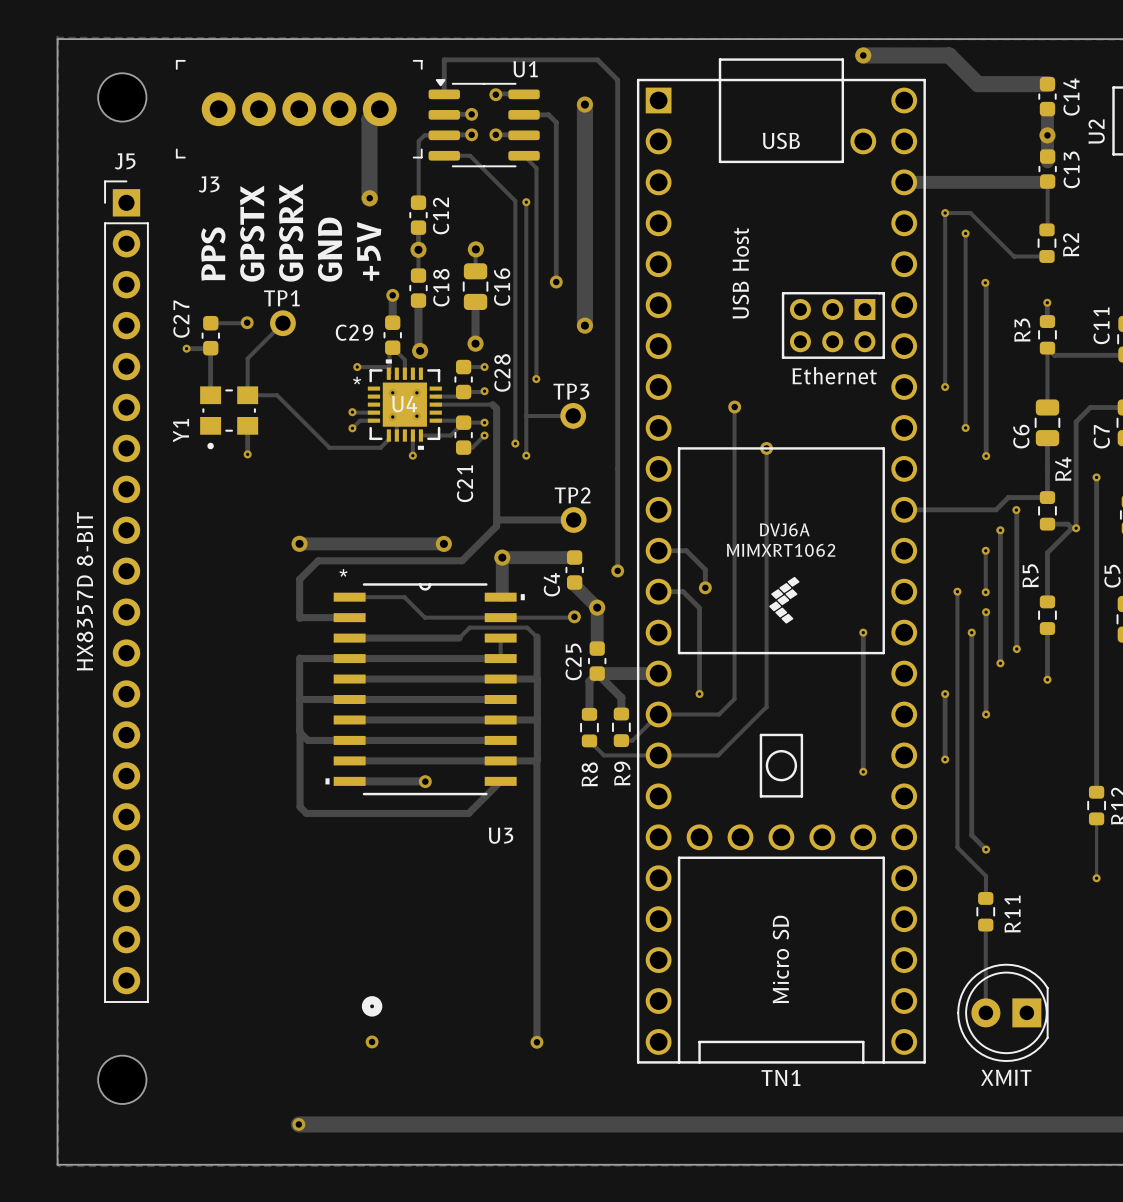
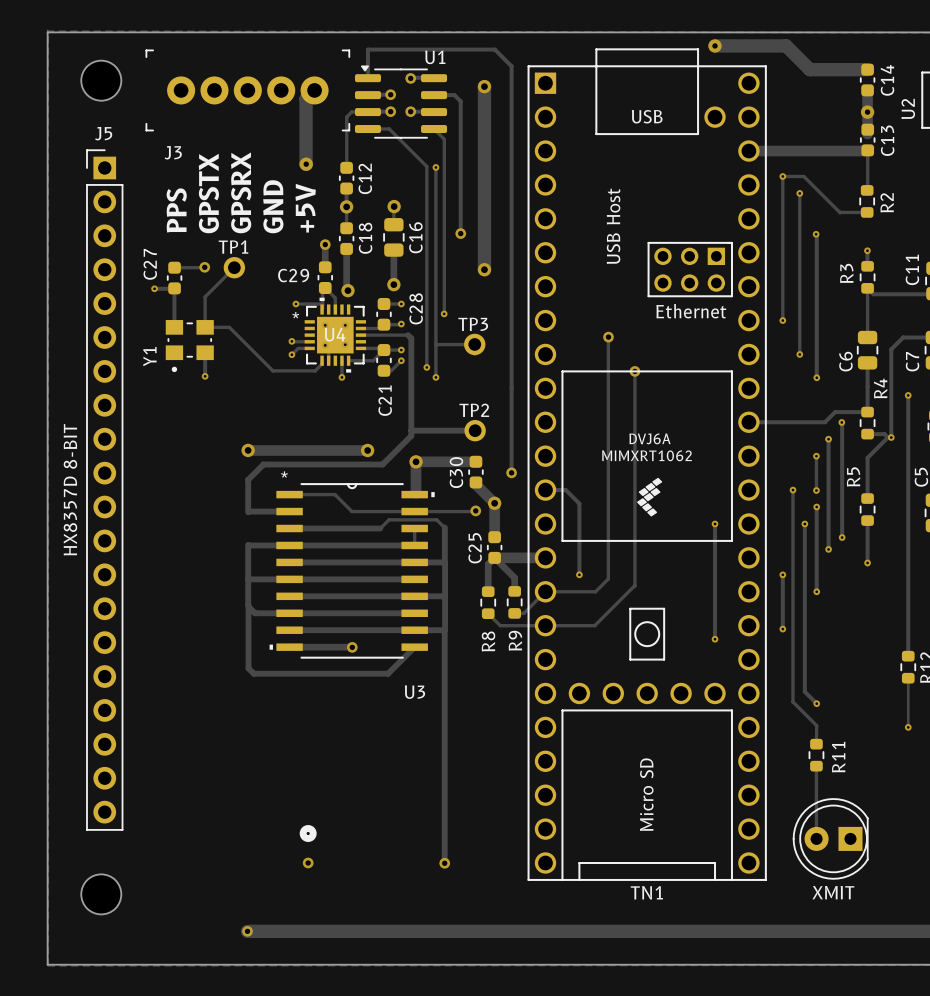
track: (658, 550) (686, 550) (705, 569) (705, 587) -> none
C4 name: C4 (551, 584) -> C30 (456, 472)
via: (705, 587) -> none

